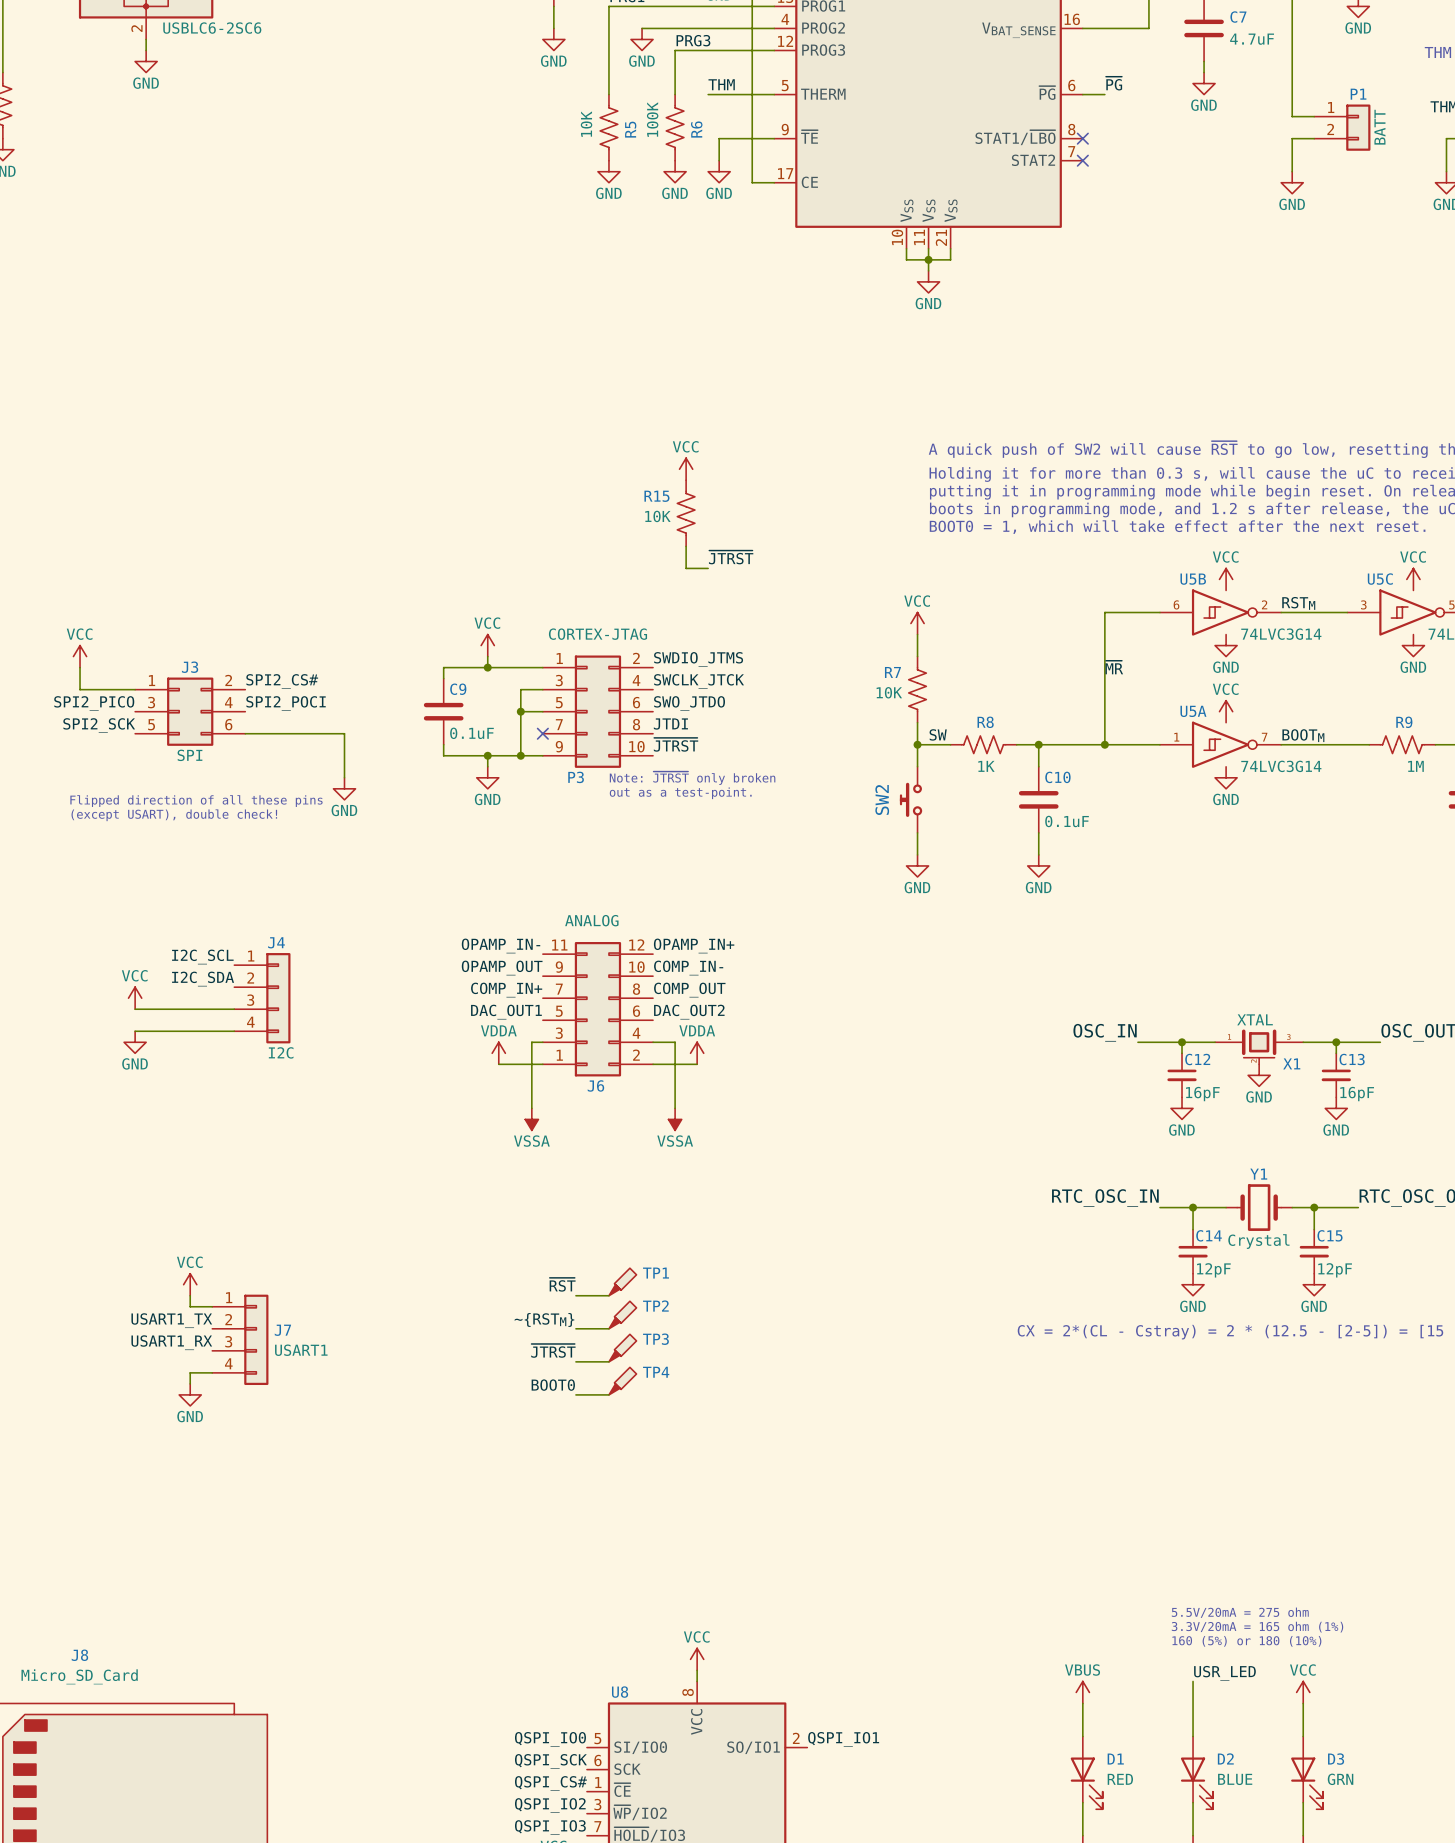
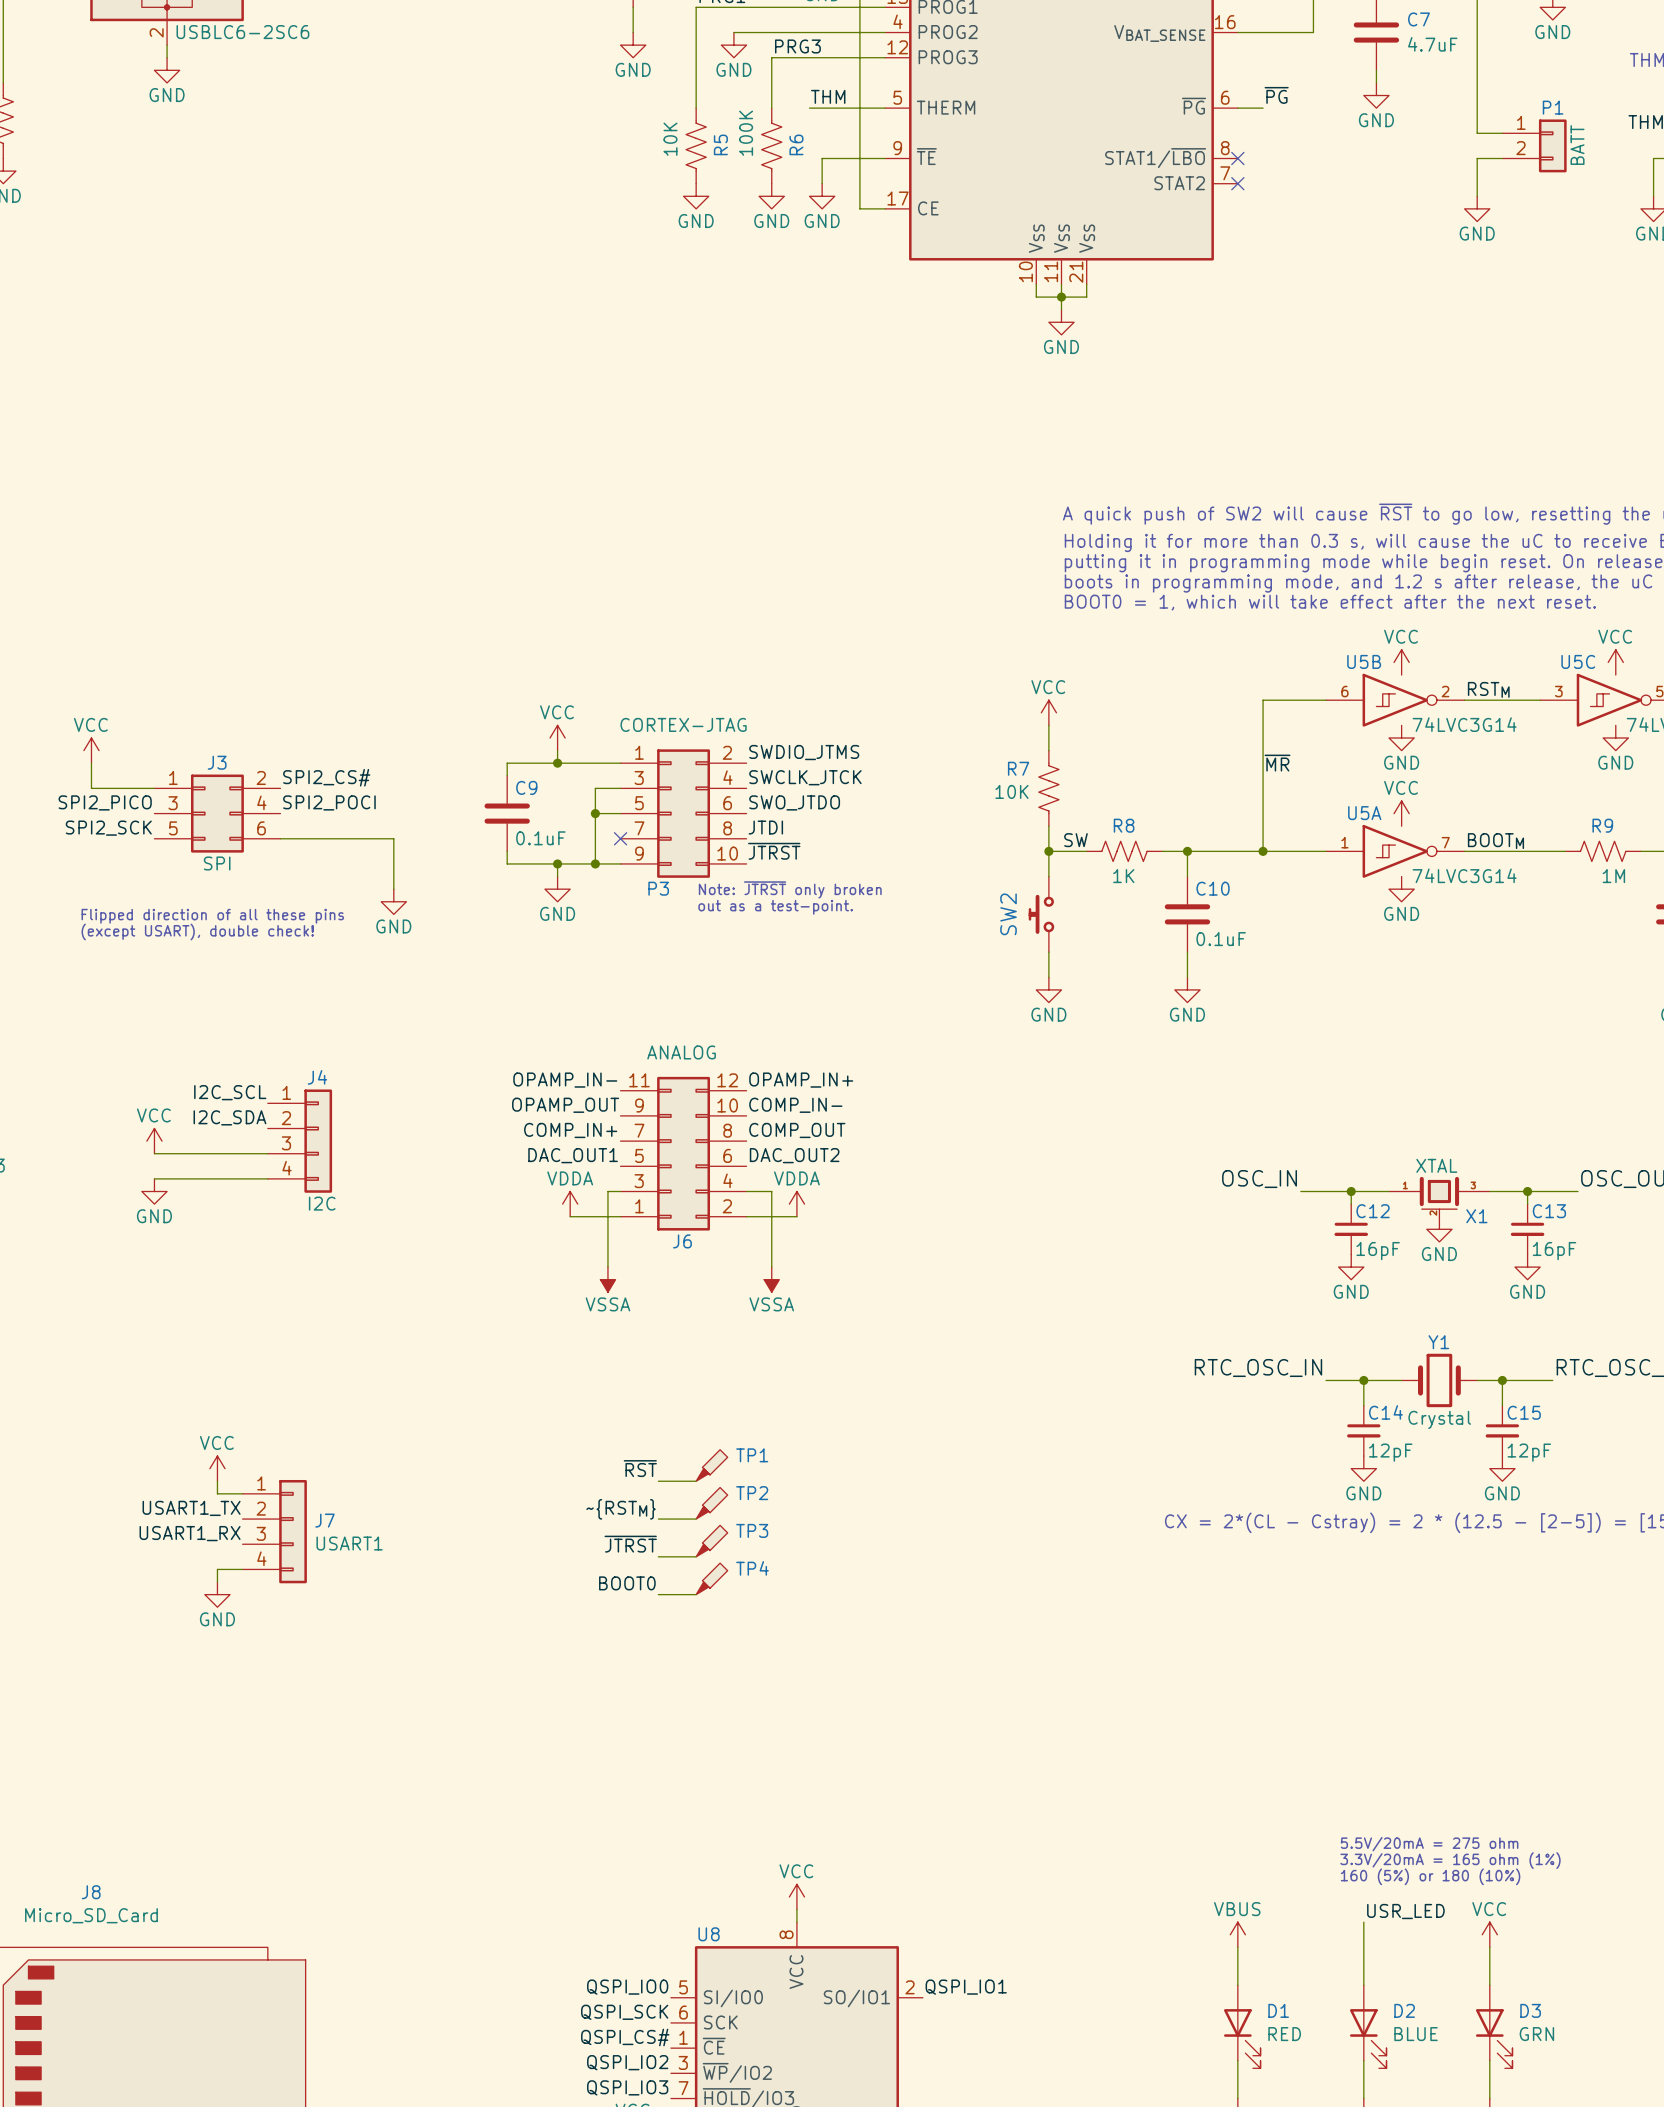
power symbol: VCC (686, 469) -> none
R15: 10K (686, 513) -> none
wire: (686, 546) (686, 568) (708, 568) -> none
label: ~{JTRST} (731, 557) -> none

